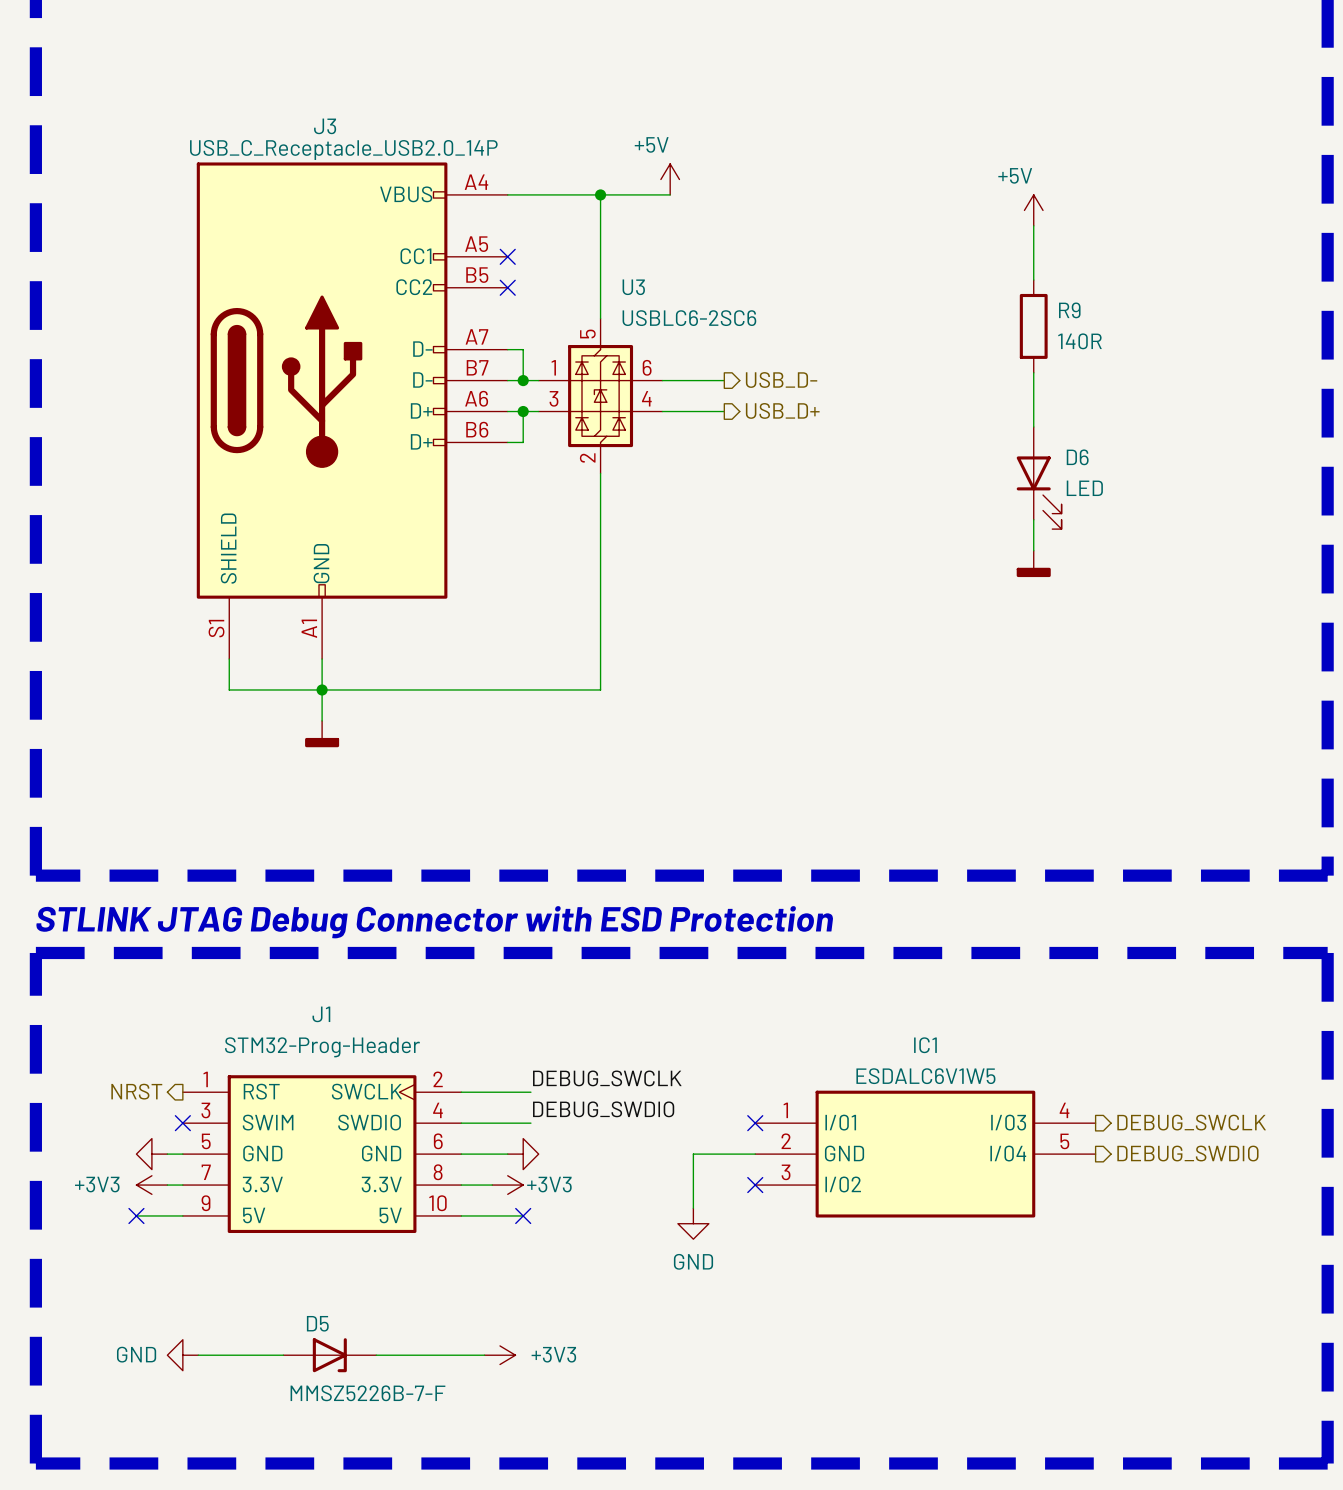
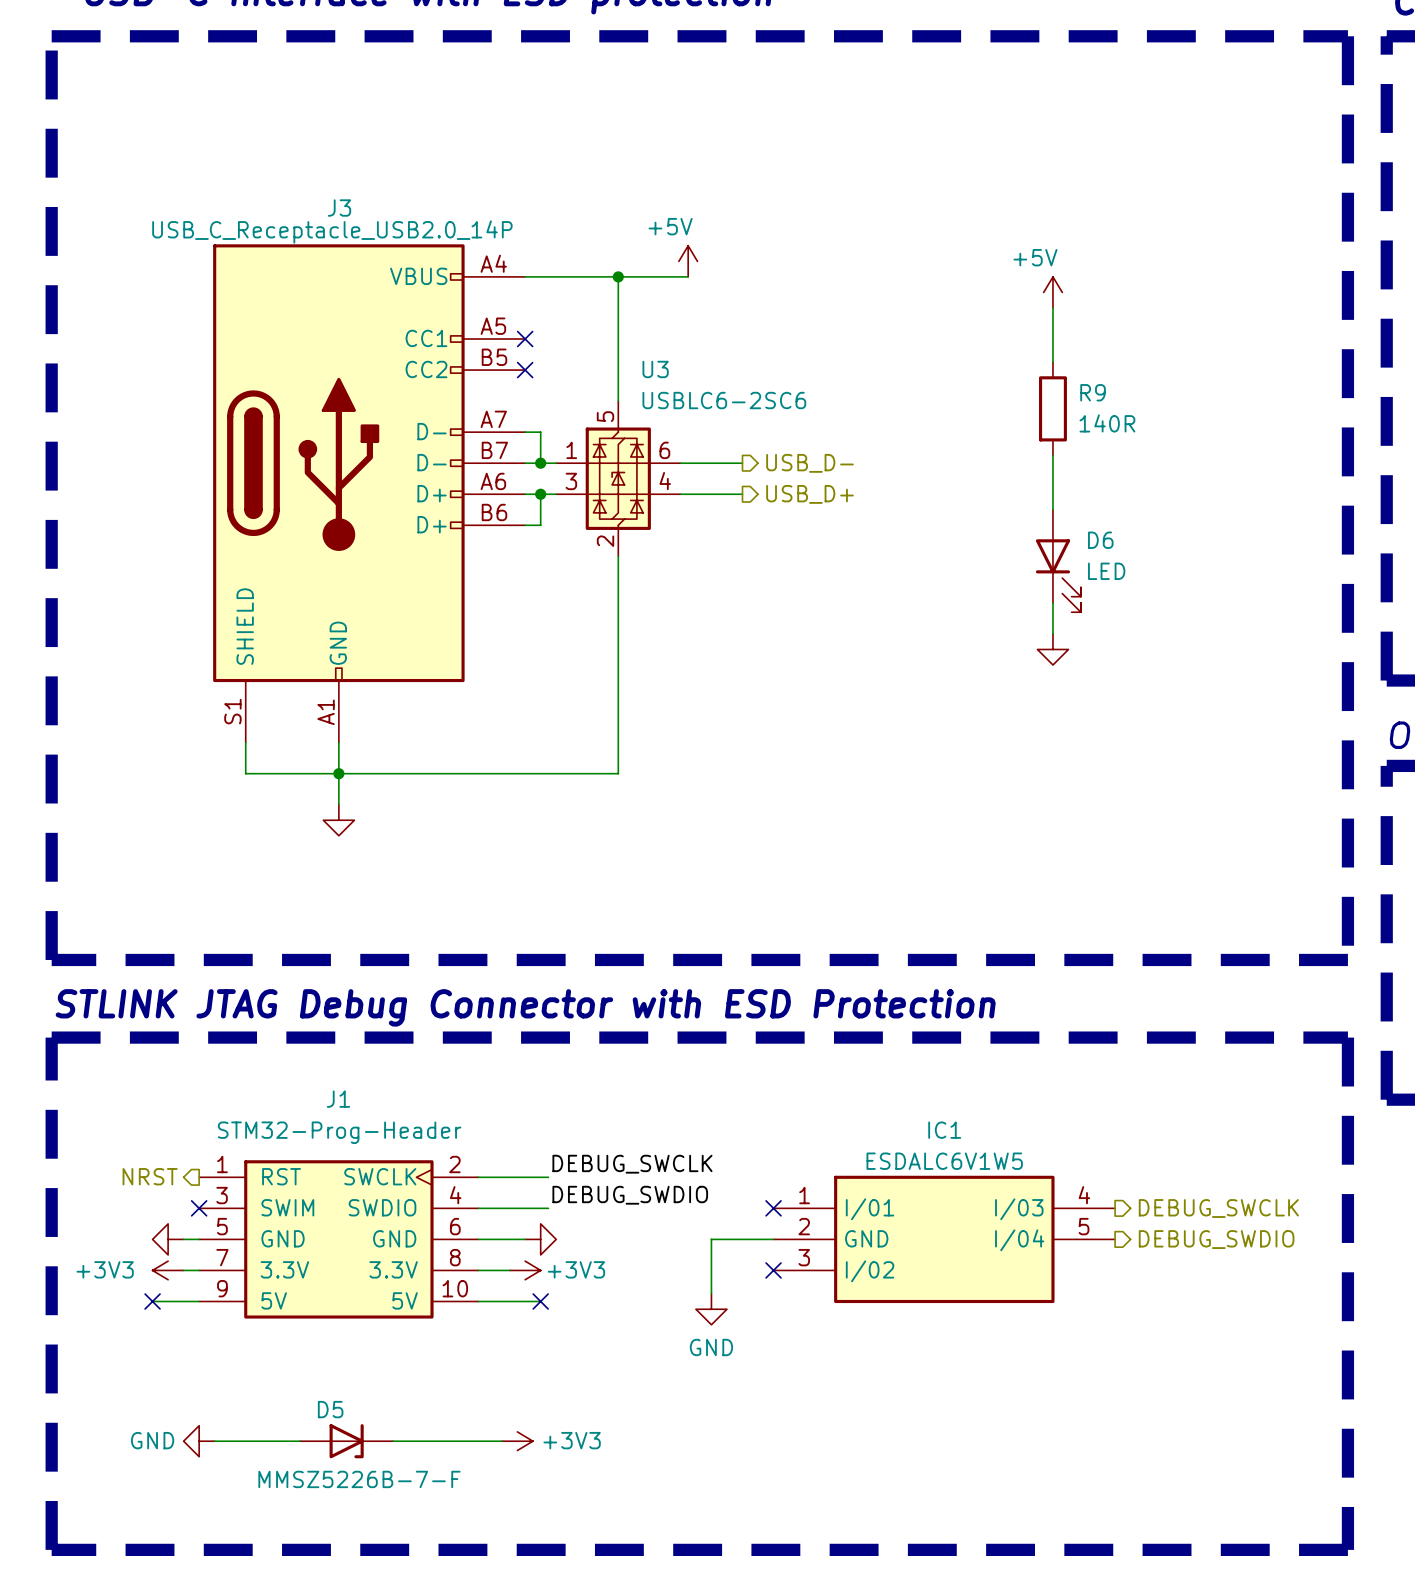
power symbol shape: [1016, 550, 1051, 578] -> [1037, 633, 1069, 666]
power symbol shape: [305, 720, 340, 748] -> [323, 804, 355, 836]

